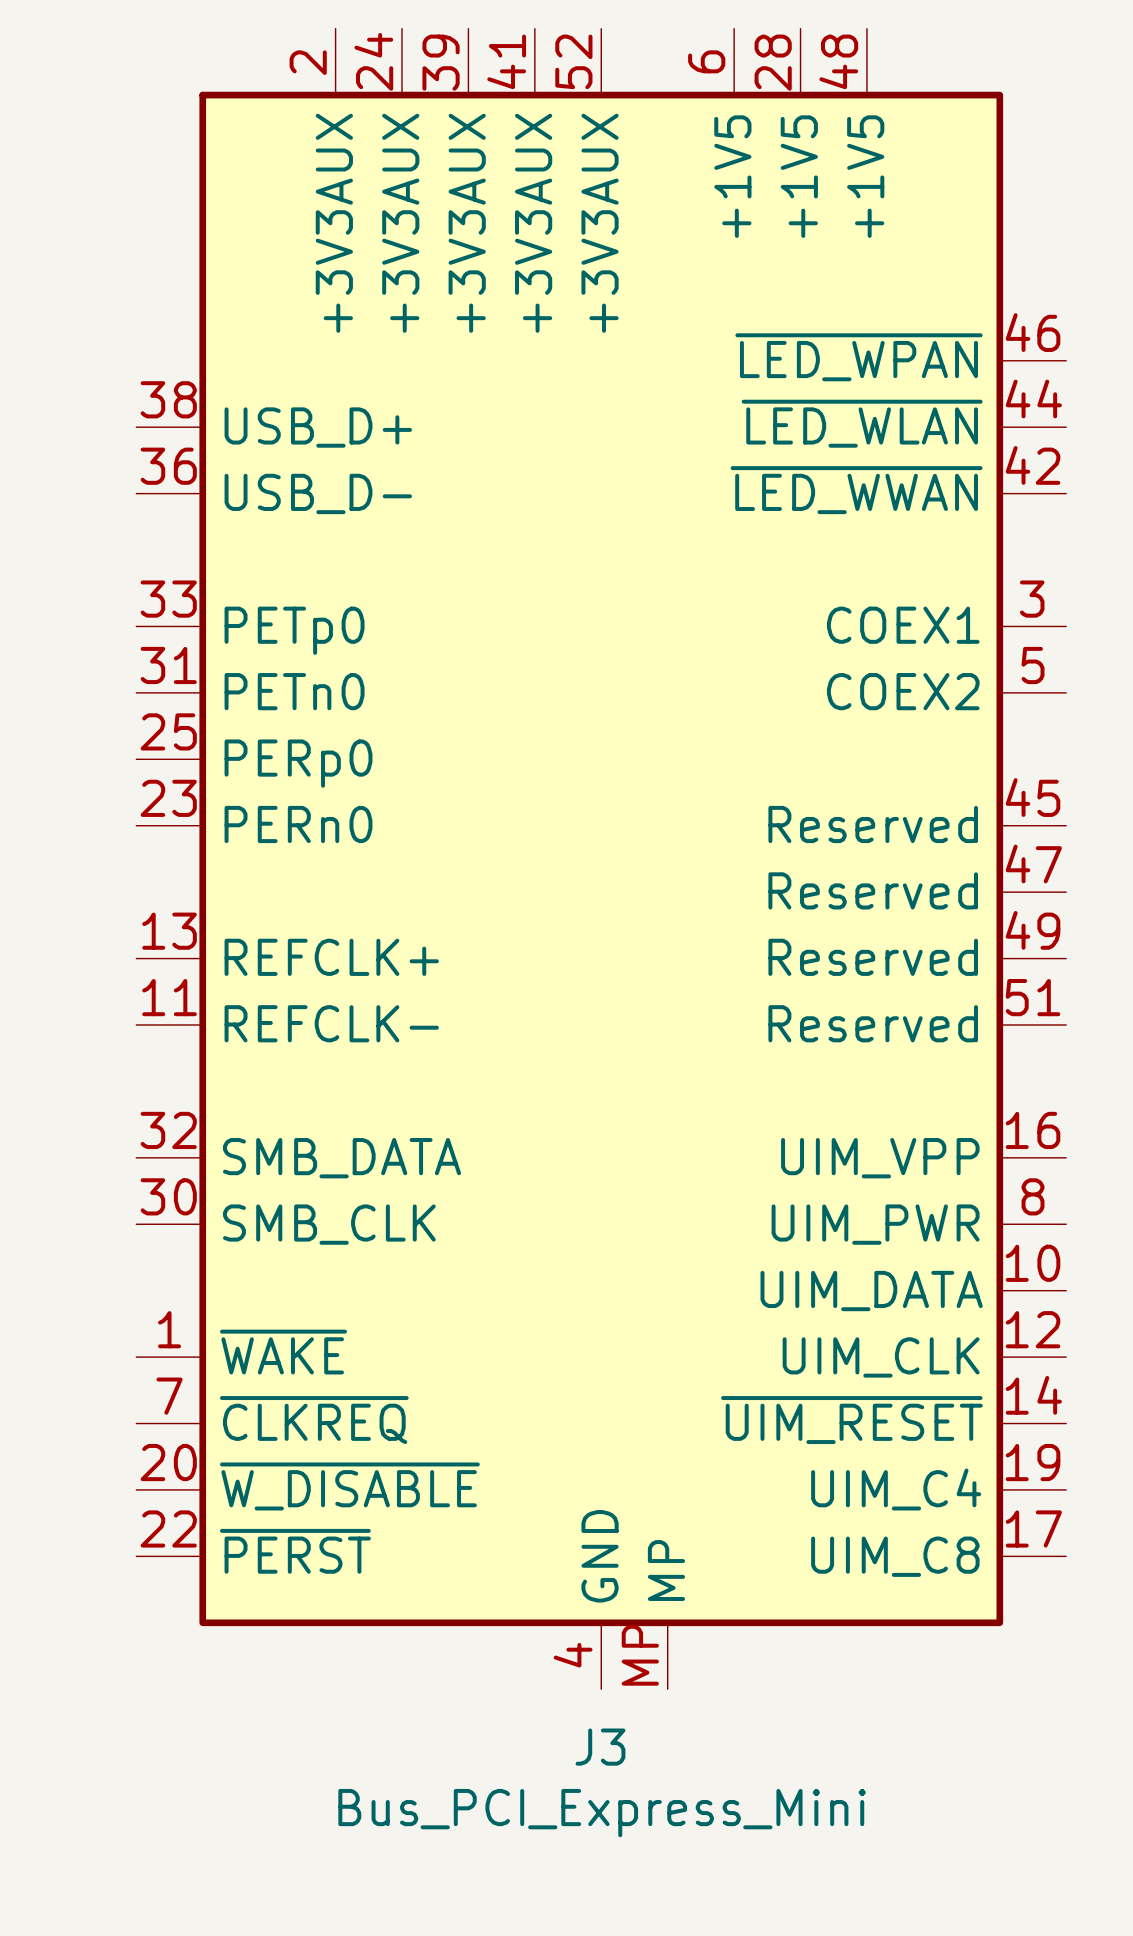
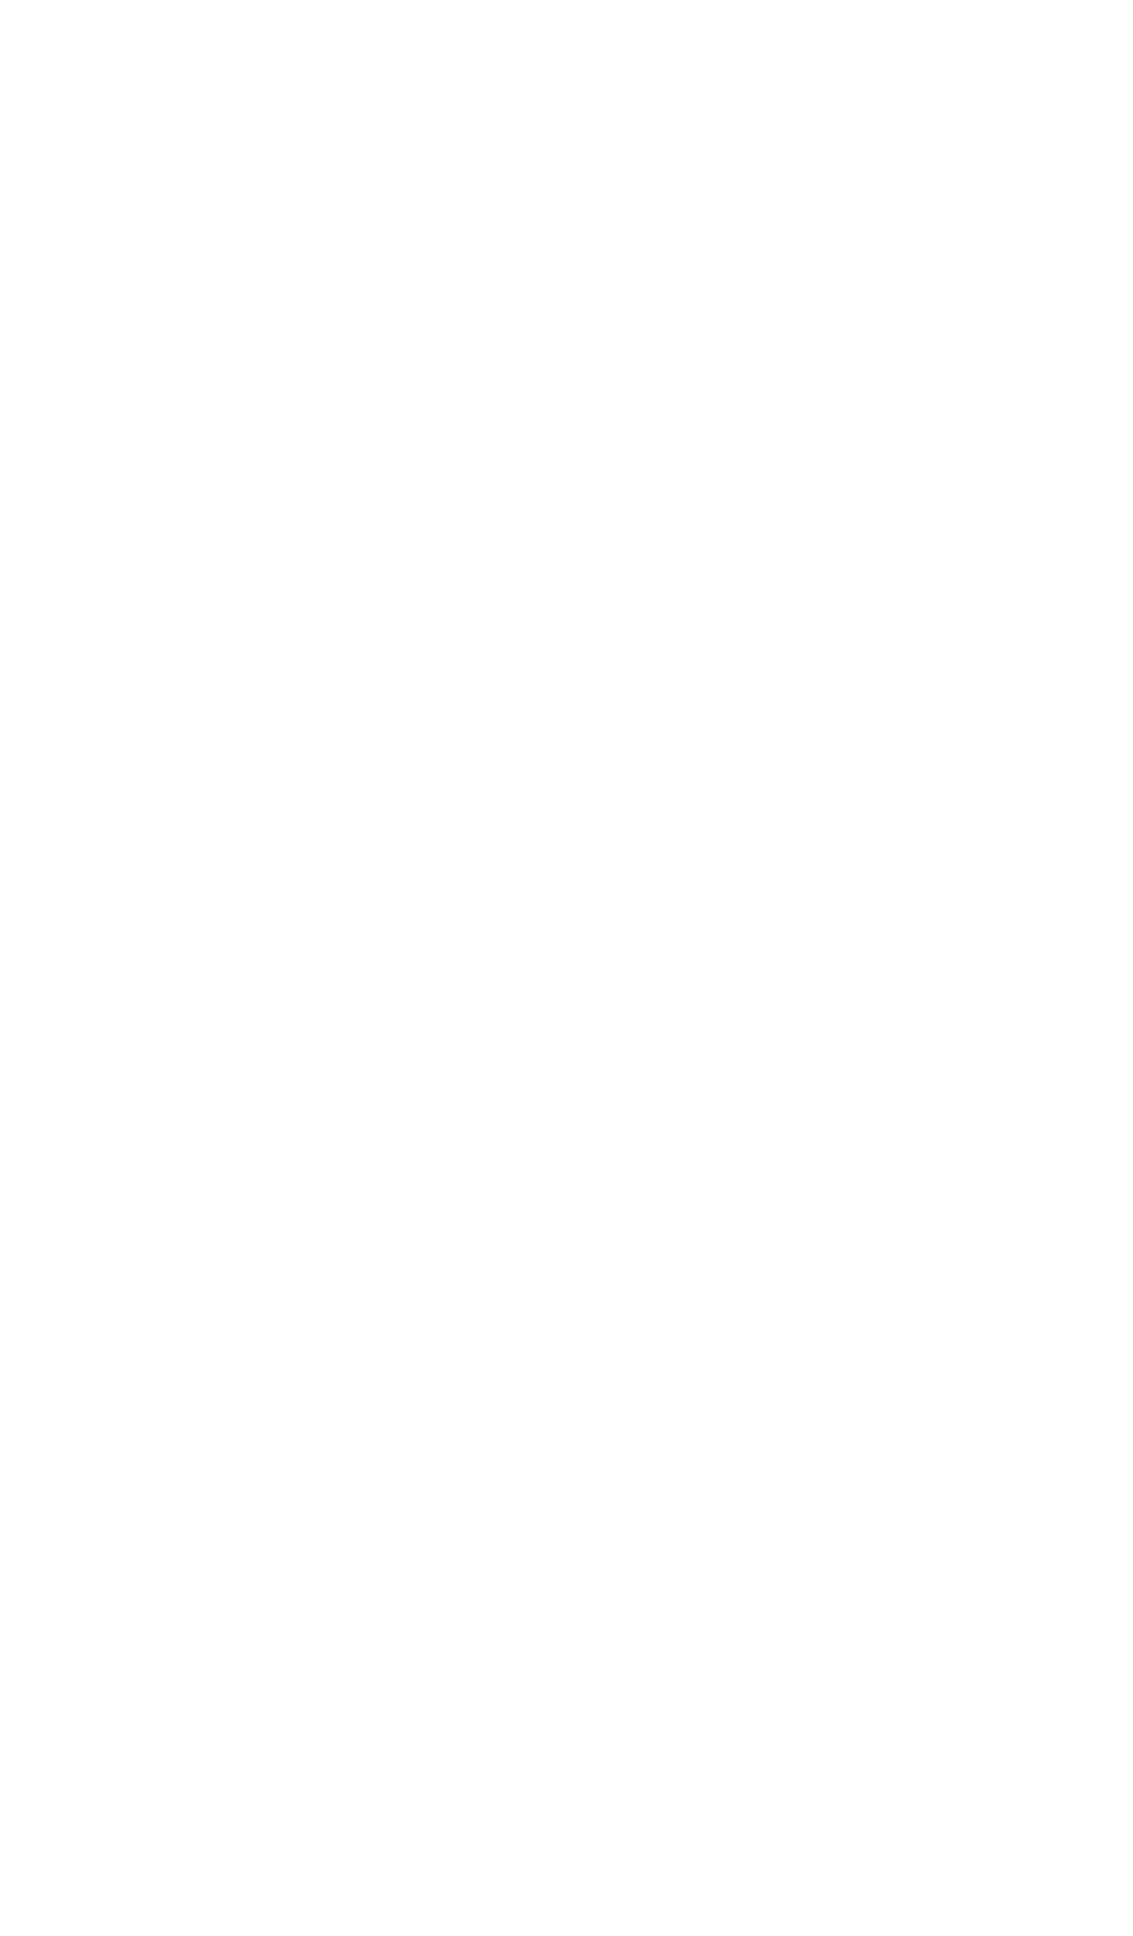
J3: Bus_PCI_Express_Mini (601, 858) -> none

